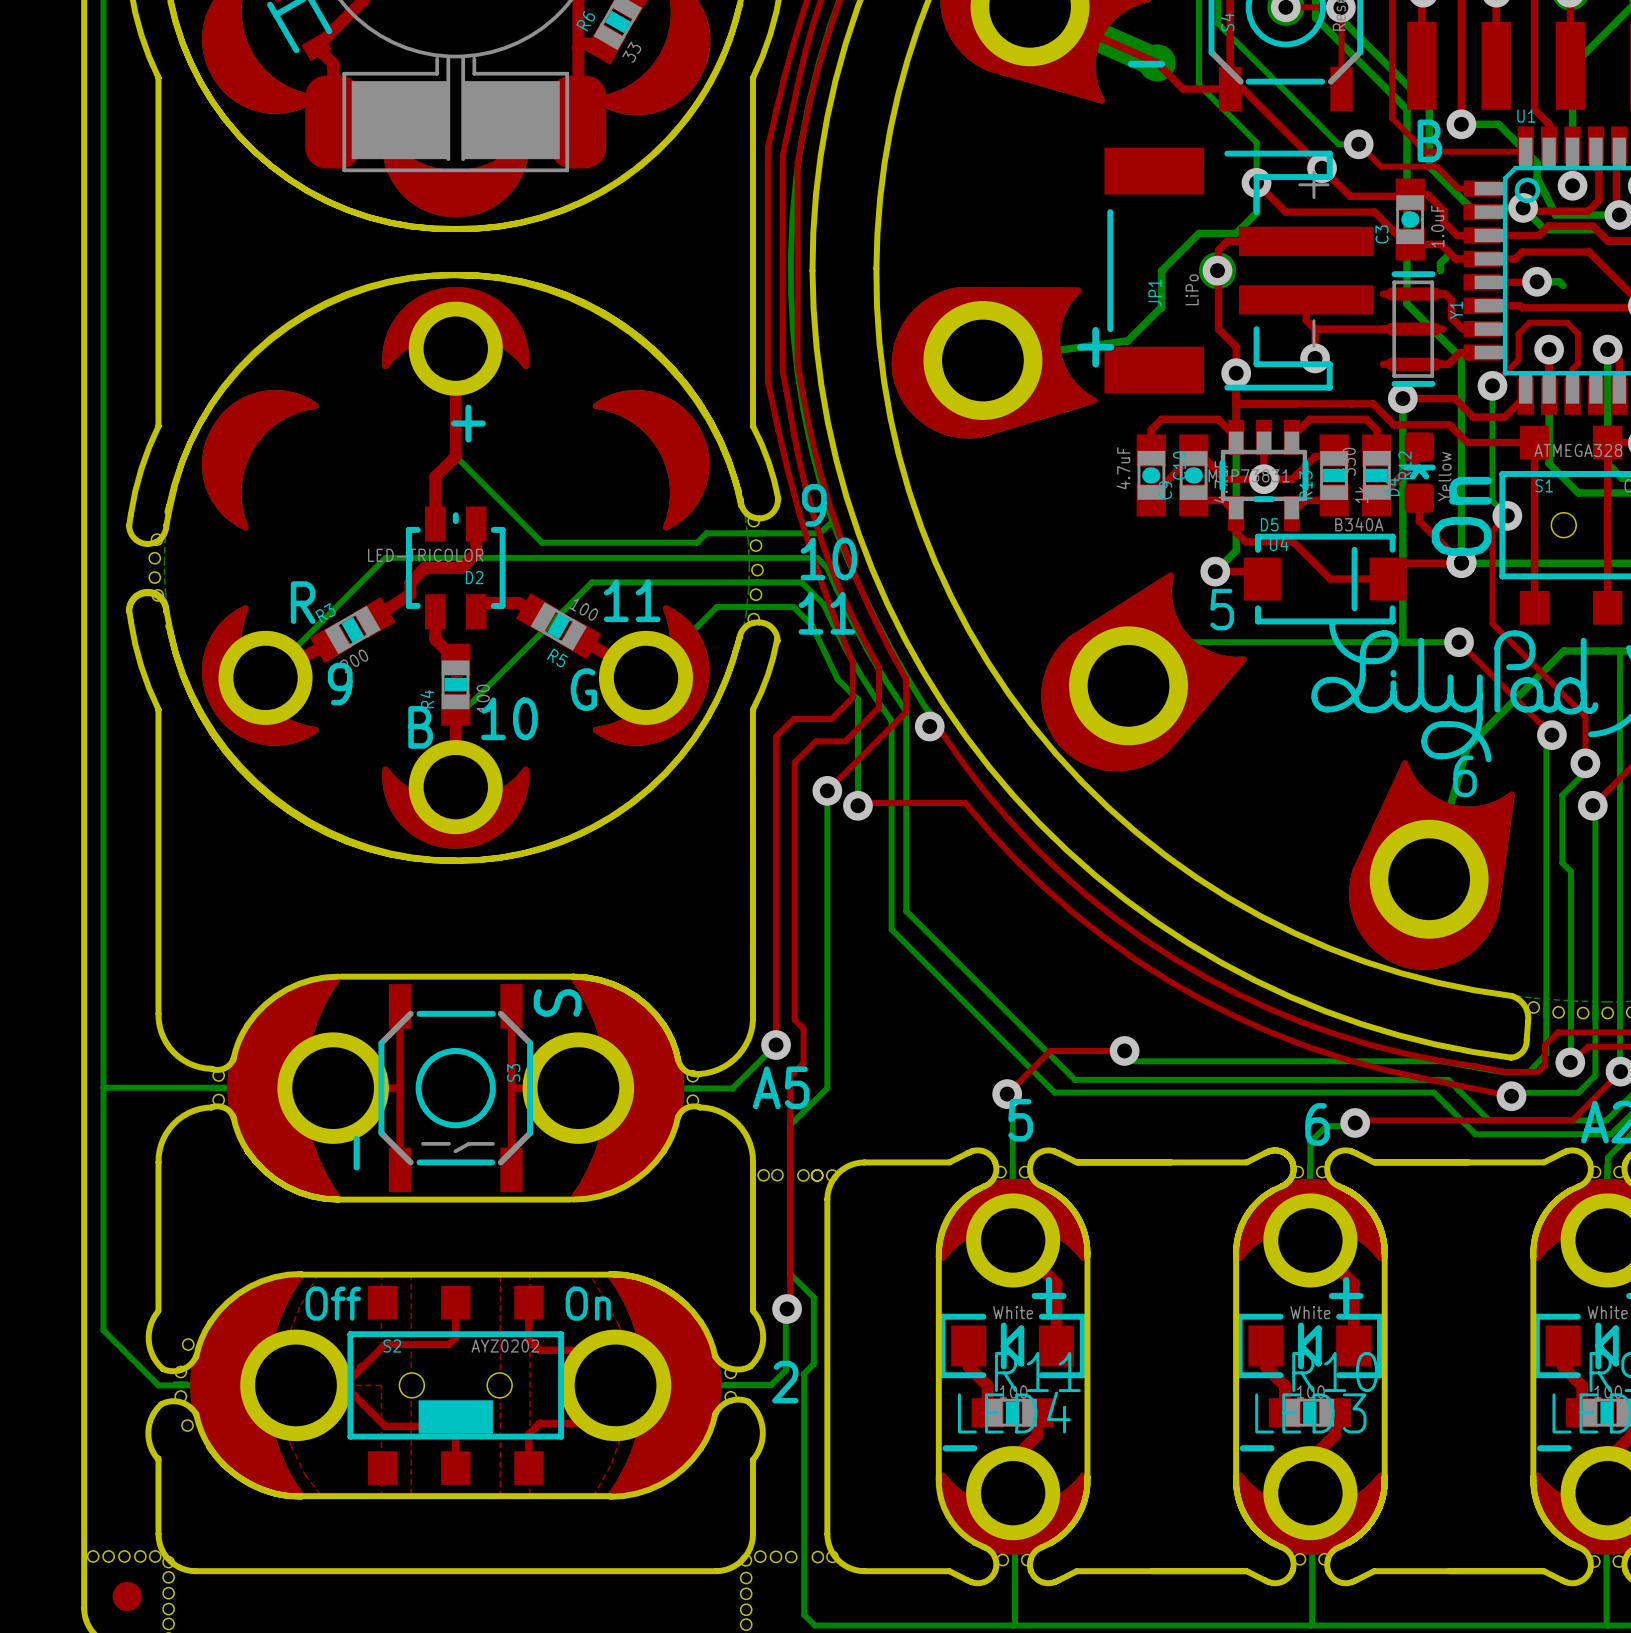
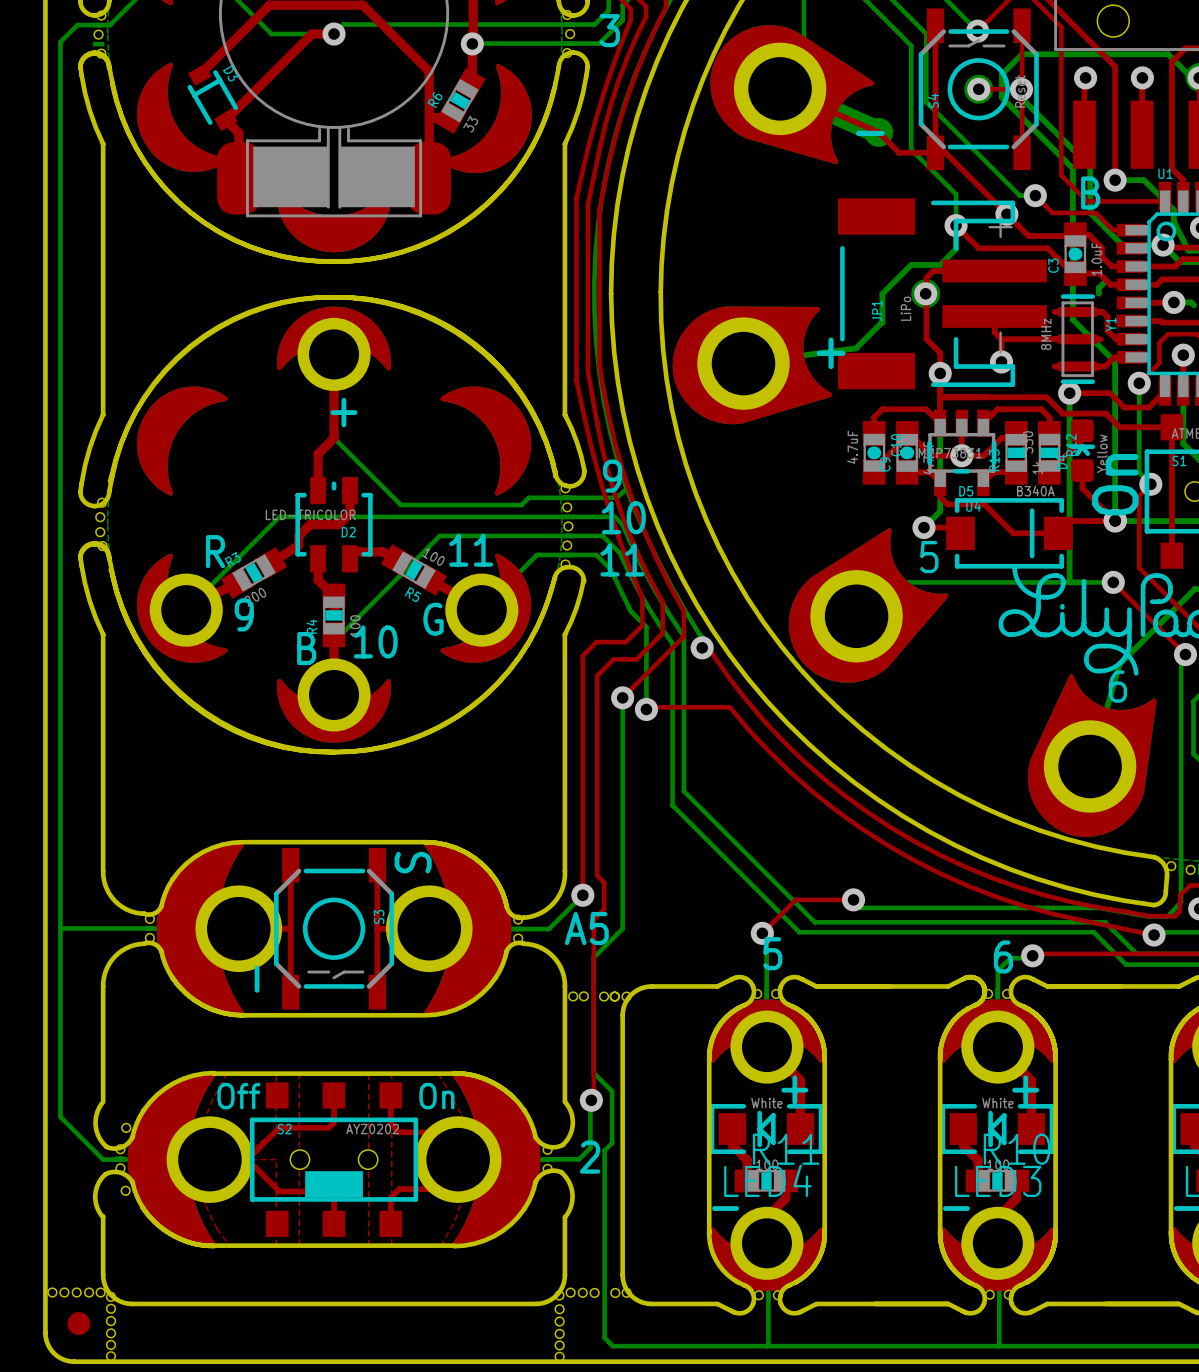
Y1 value: none -> 8MHz (1046, 334)

